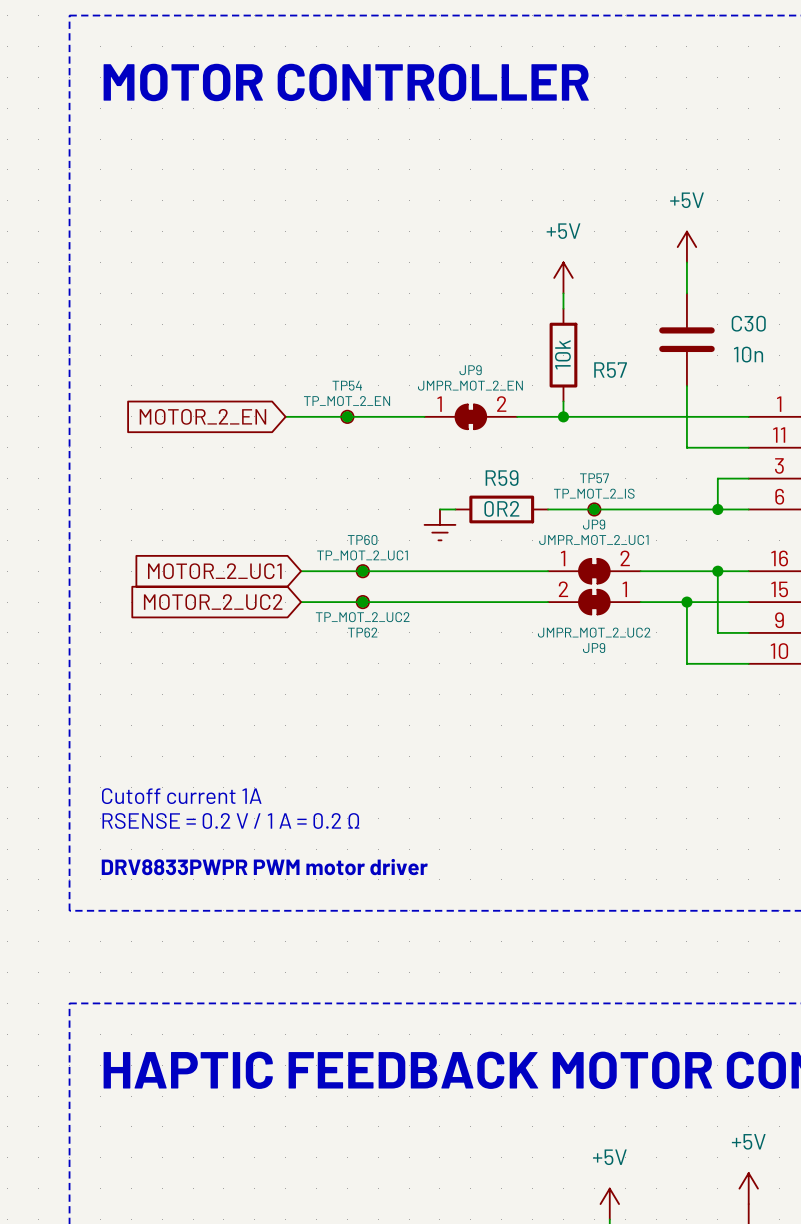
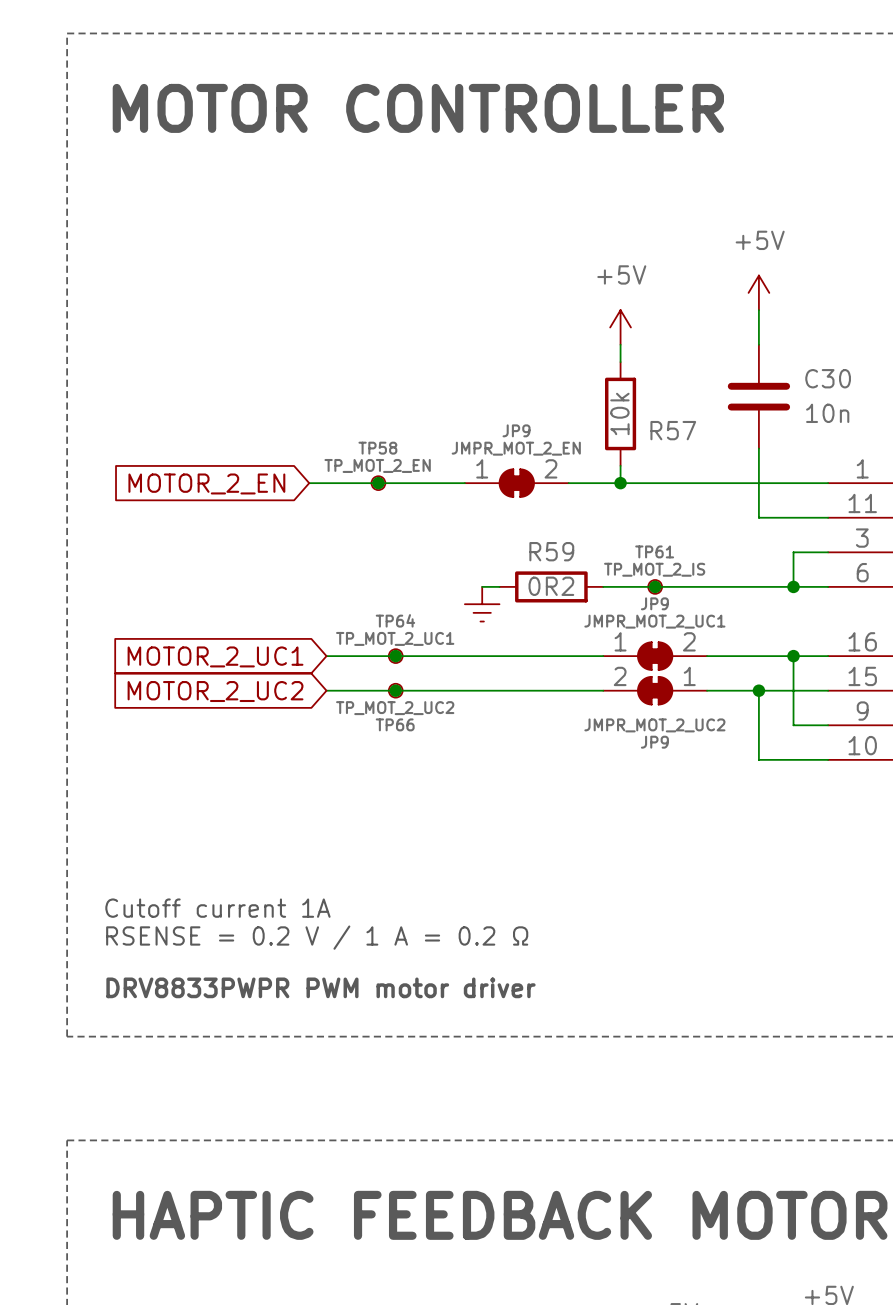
TP54 name: TP54 (347, 385) -> TP58 (377, 448)
TP57 name: TP57 (594, 478) -> TP61 (654, 551)
TP60 name: TP60 (362, 539) -> TP64 (395, 620)
TP62 name: TP62 (362, 632) -> TP66 (395, 724)

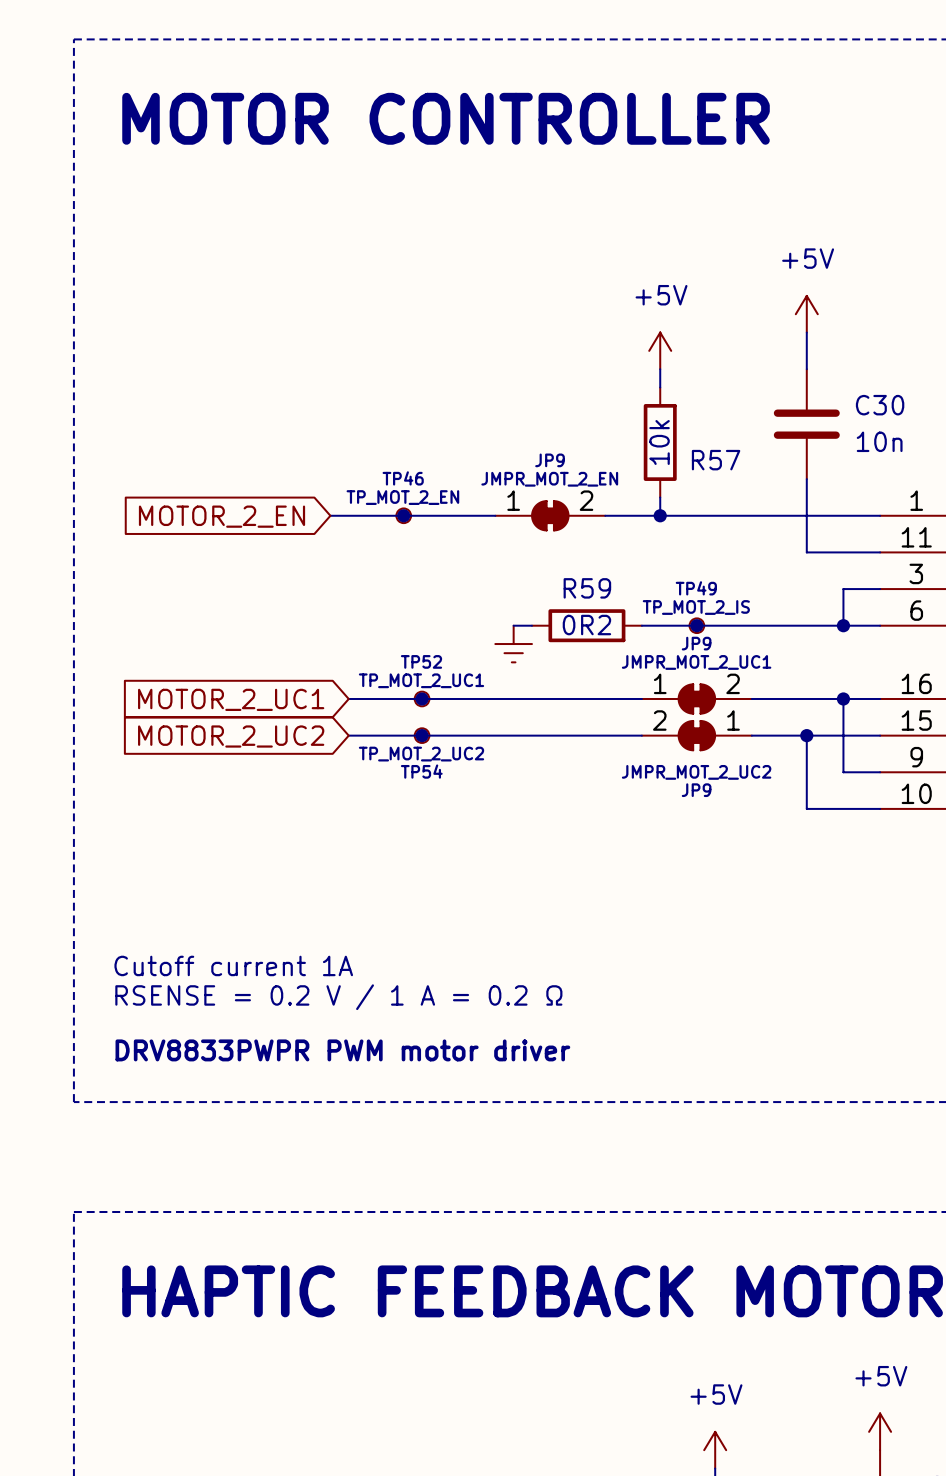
TP58 name: TP58 (377, 448) -> TP46 (403, 478)
TP61 name: TP61 (654, 551) -> TP49 (696, 588)
TP64 name: TP64 (395, 620) -> TP52 (421, 661)
TP66 name: TP66 (395, 724) -> TP54 (421, 771)

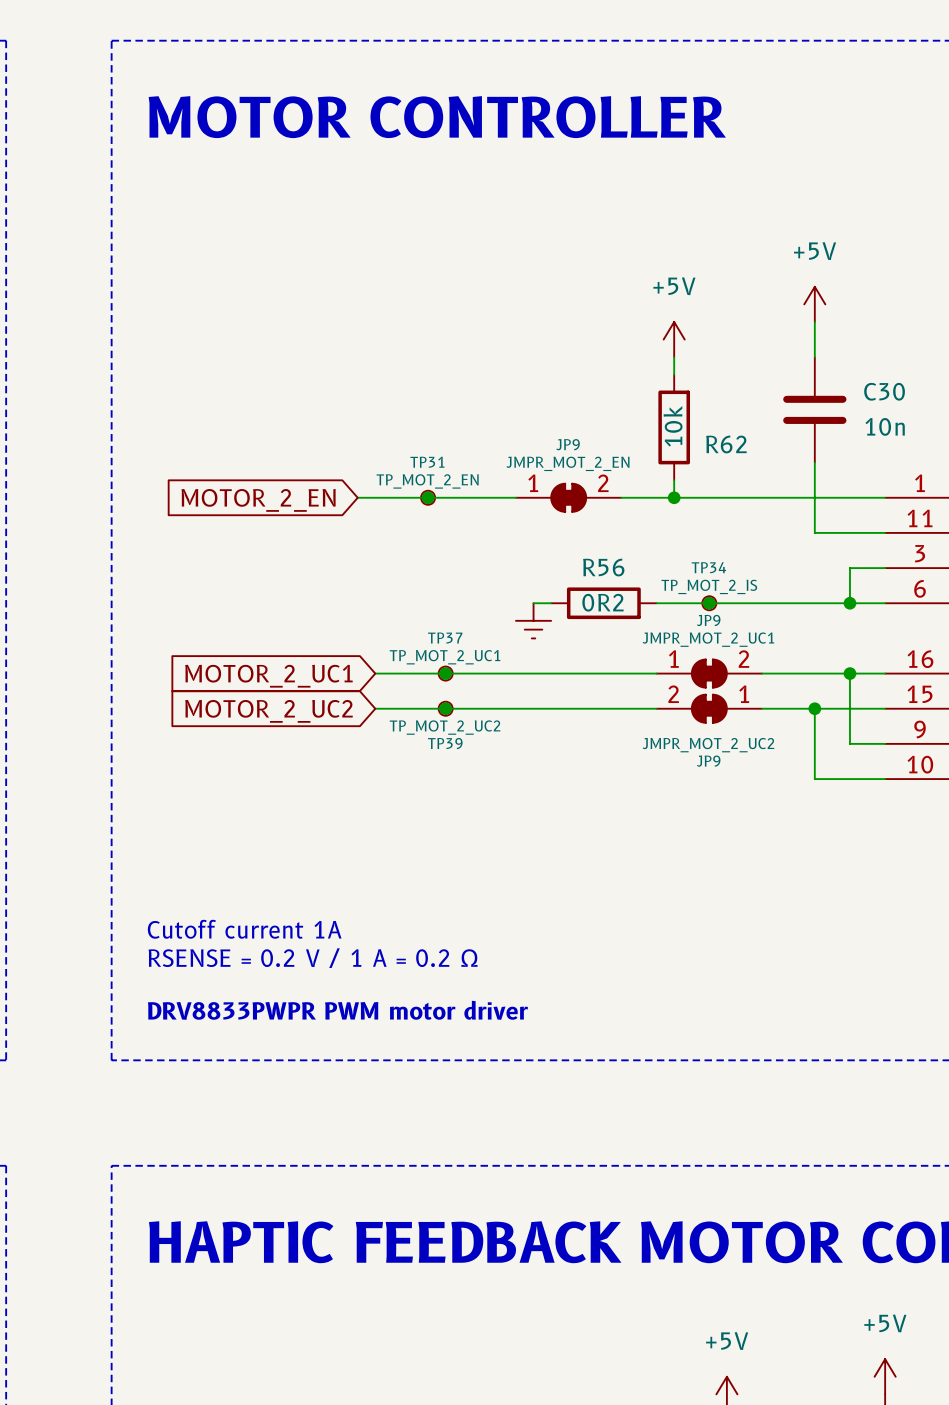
R57 name: R57 (716, 460) -> R62 (726, 444)
TP46 name: TP46 (403, 478) -> TP31 (427, 462)
R59 name: R59 (587, 588) -> R56 (603, 567)
TP49 name: TP49 (696, 588) -> TP34 (708, 567)
TP52 name: TP52 (421, 661) -> TP37 (445, 638)
TP54 name: TP54 (421, 771) -> TP39 (445, 743)

